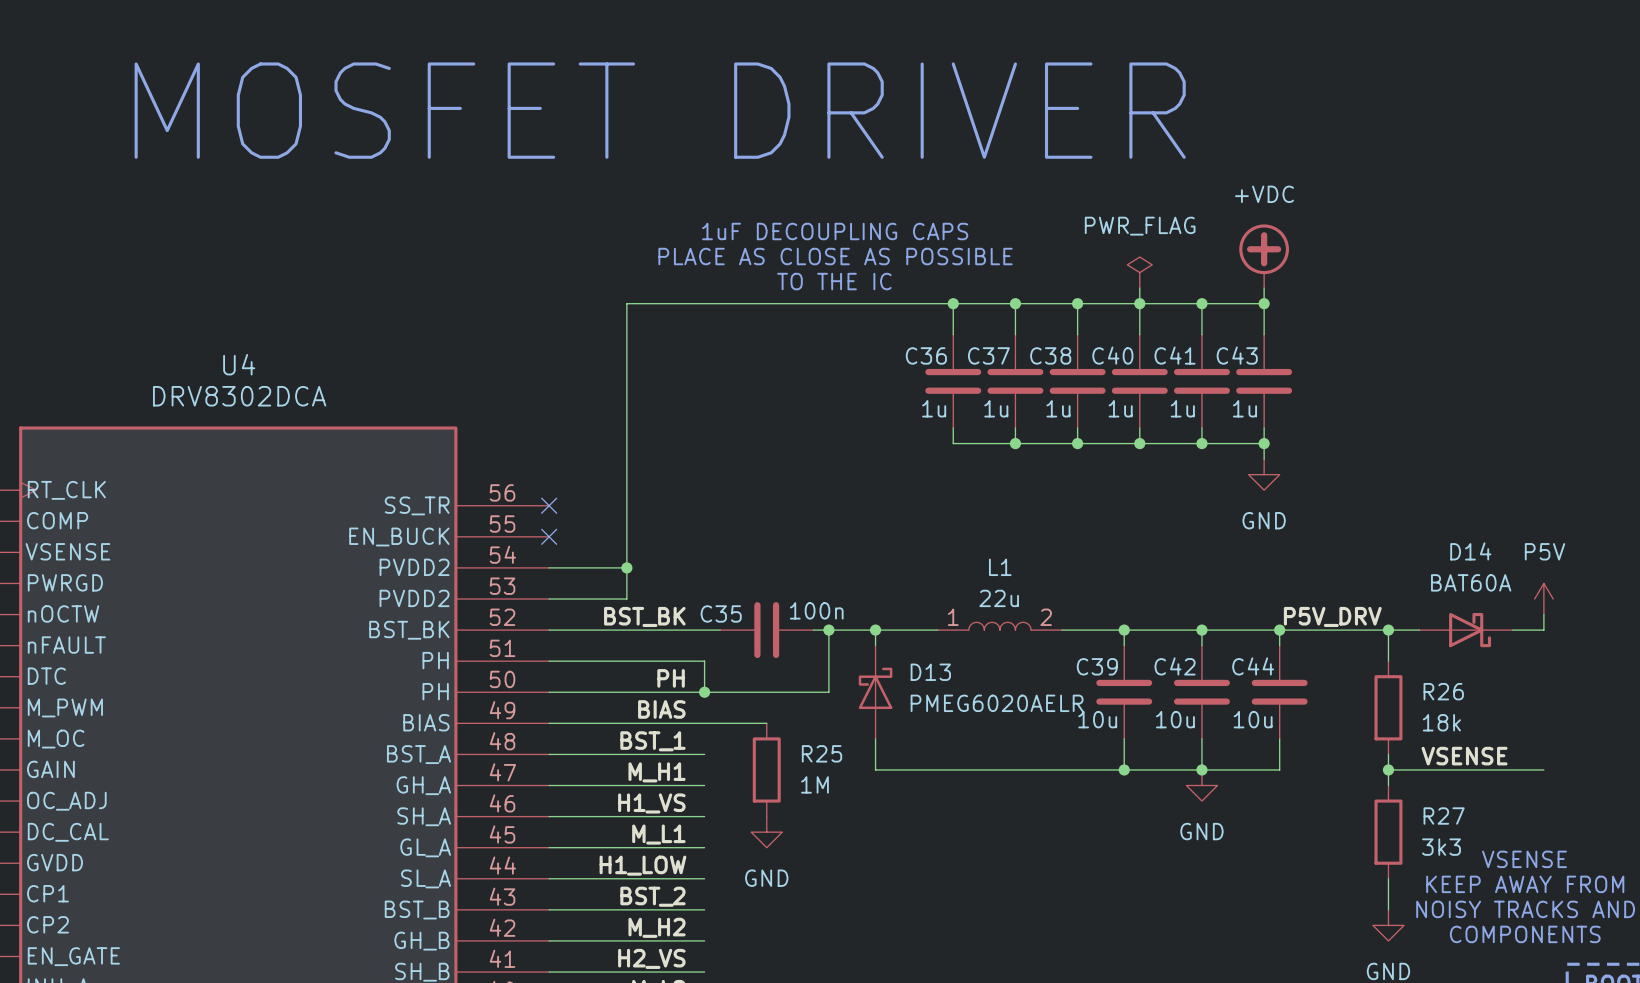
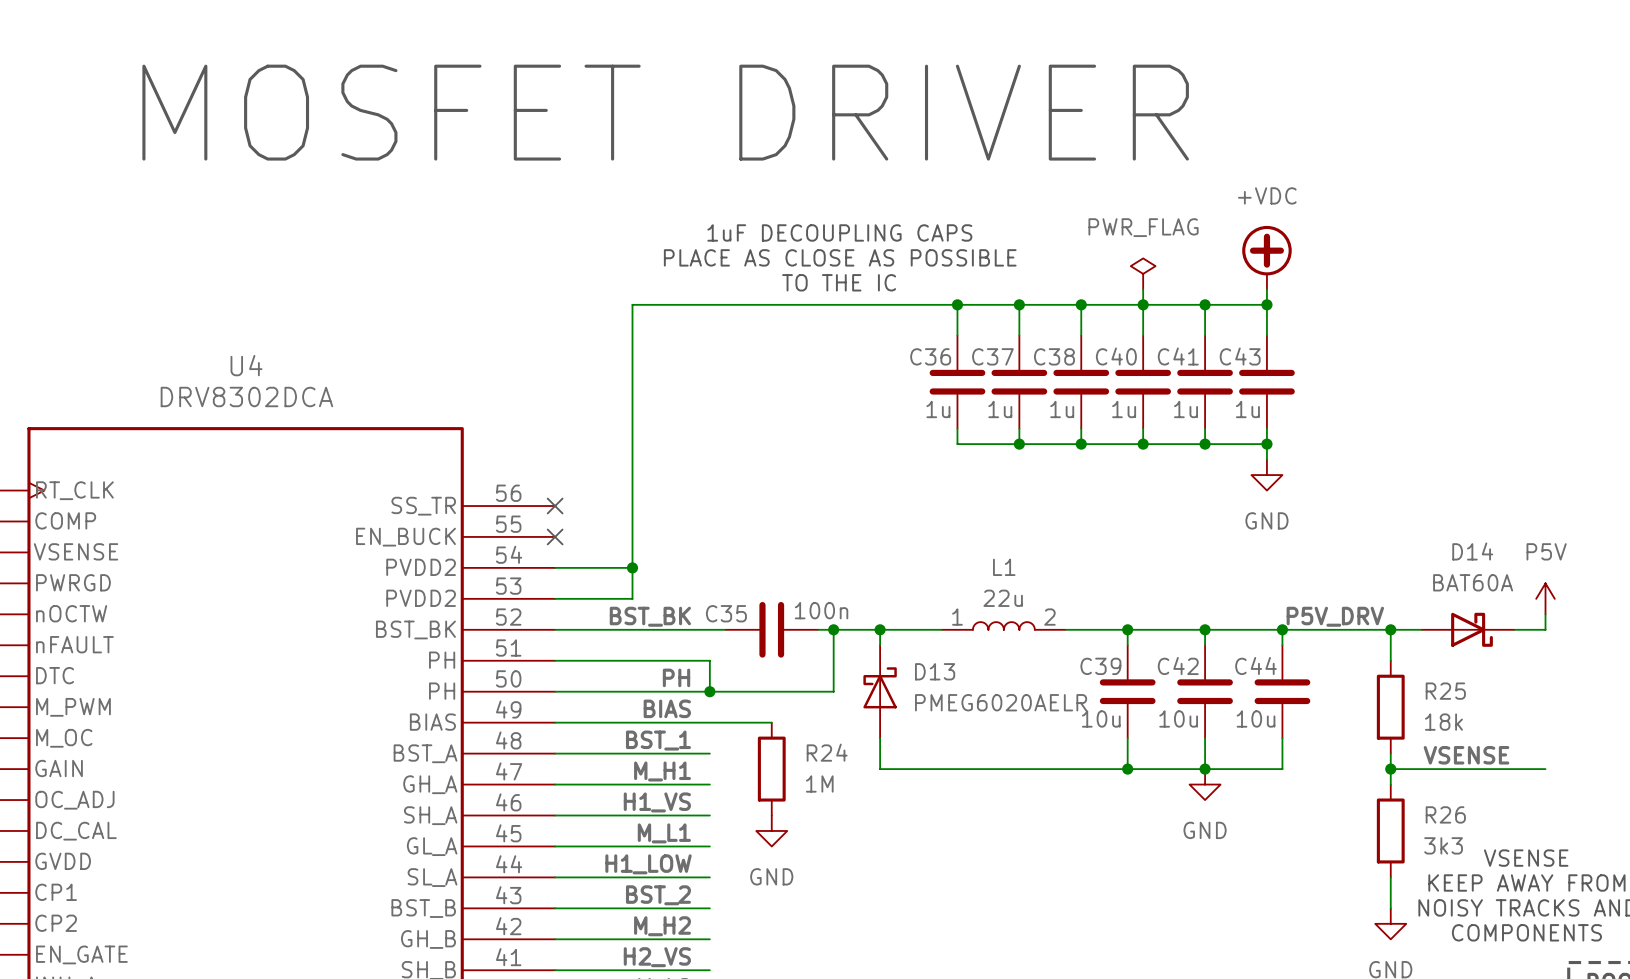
R26 name: R26 (1443, 691) -> R25 (1445, 691)
R25 name: R25 (822, 753) -> R24 (827, 752)
R27 name: R27 (1444, 816) -> R26 (1445, 814)

